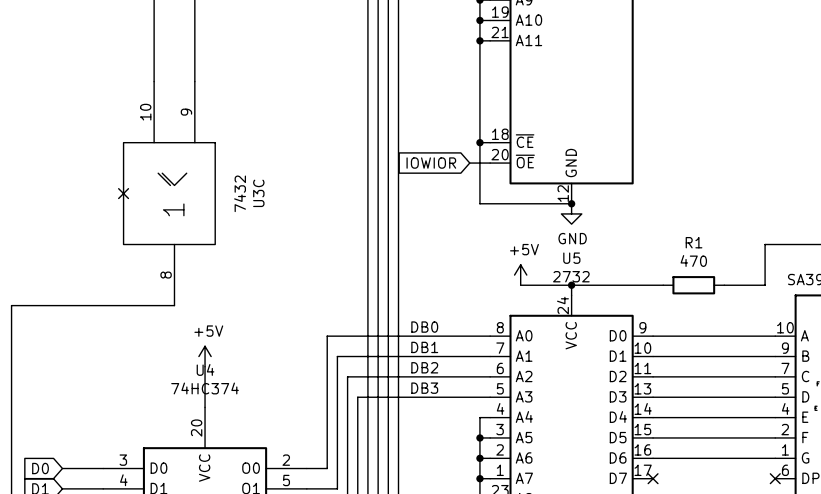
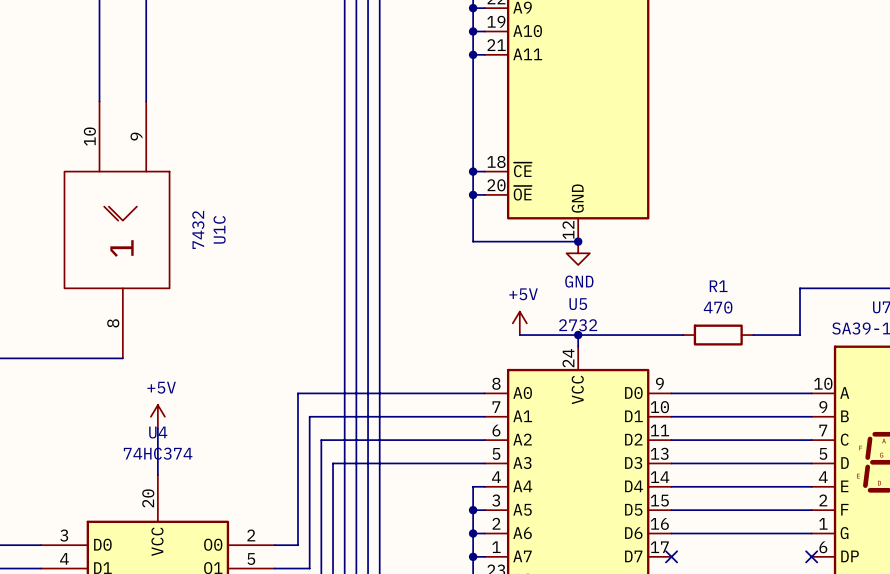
global label: IOWIOR (431, 163) -> none
wire: (469, 163) (479, 163) -> none
junction: none -> (473, 194)
no-connect mark: (123, 193) -> none
U3C name: U3C (258, 193) -> U1C (219, 229)
label: DB0 (424, 327) -> none
label: DB1 (424, 347) -> none
label: DB2 (424, 367) -> none
label: DB3 (424, 388) -> none

